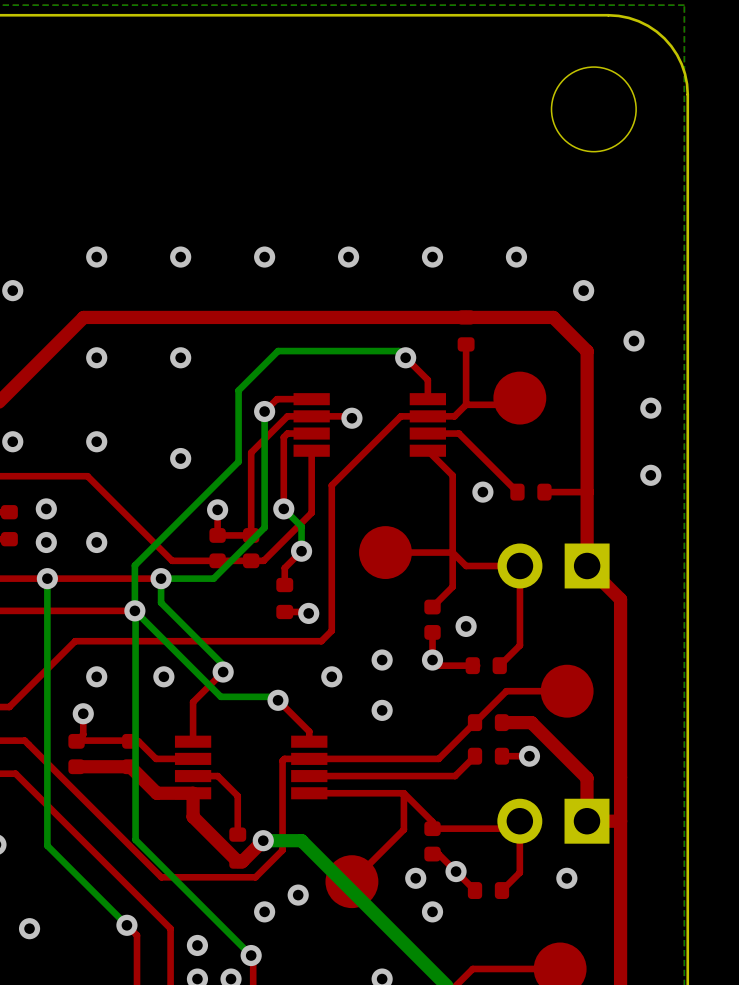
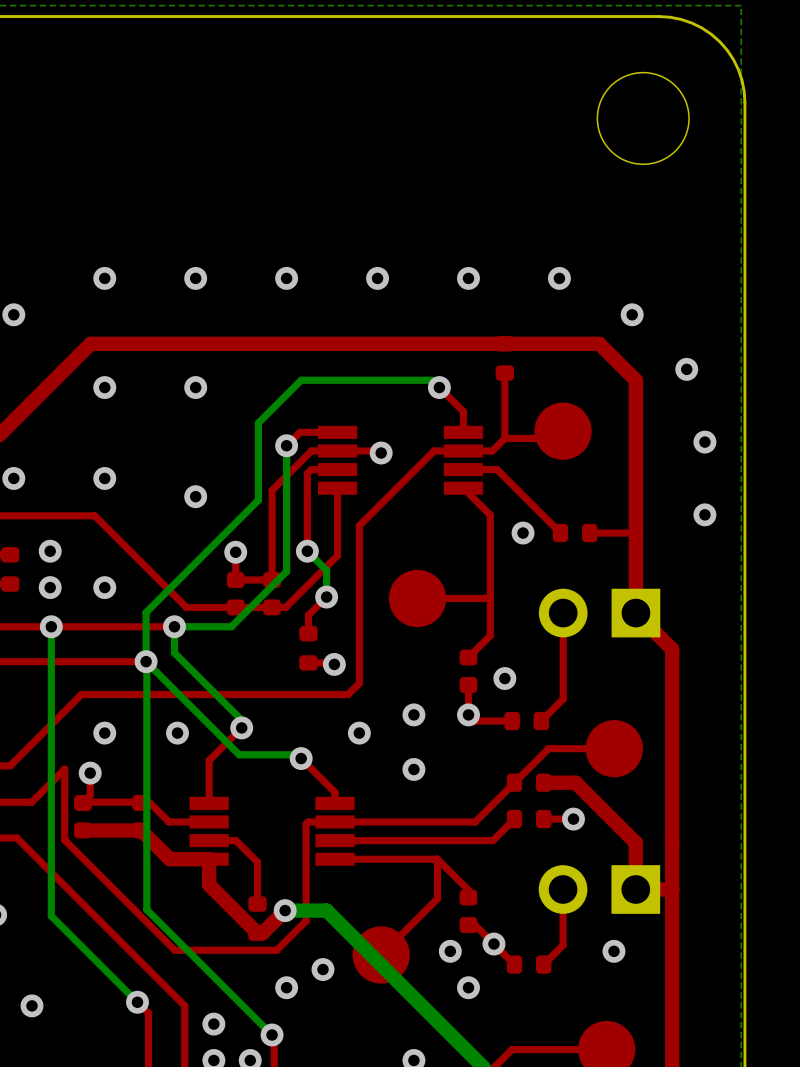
top track: (452, 552) (466, 565) (519, 565) -> none
top track: (24, 740) (59, 775) -> (26, 802) (31, 802) (64, 769) (64, 840)
top track: (519, 821) (512, 828) (432, 828) -> none

